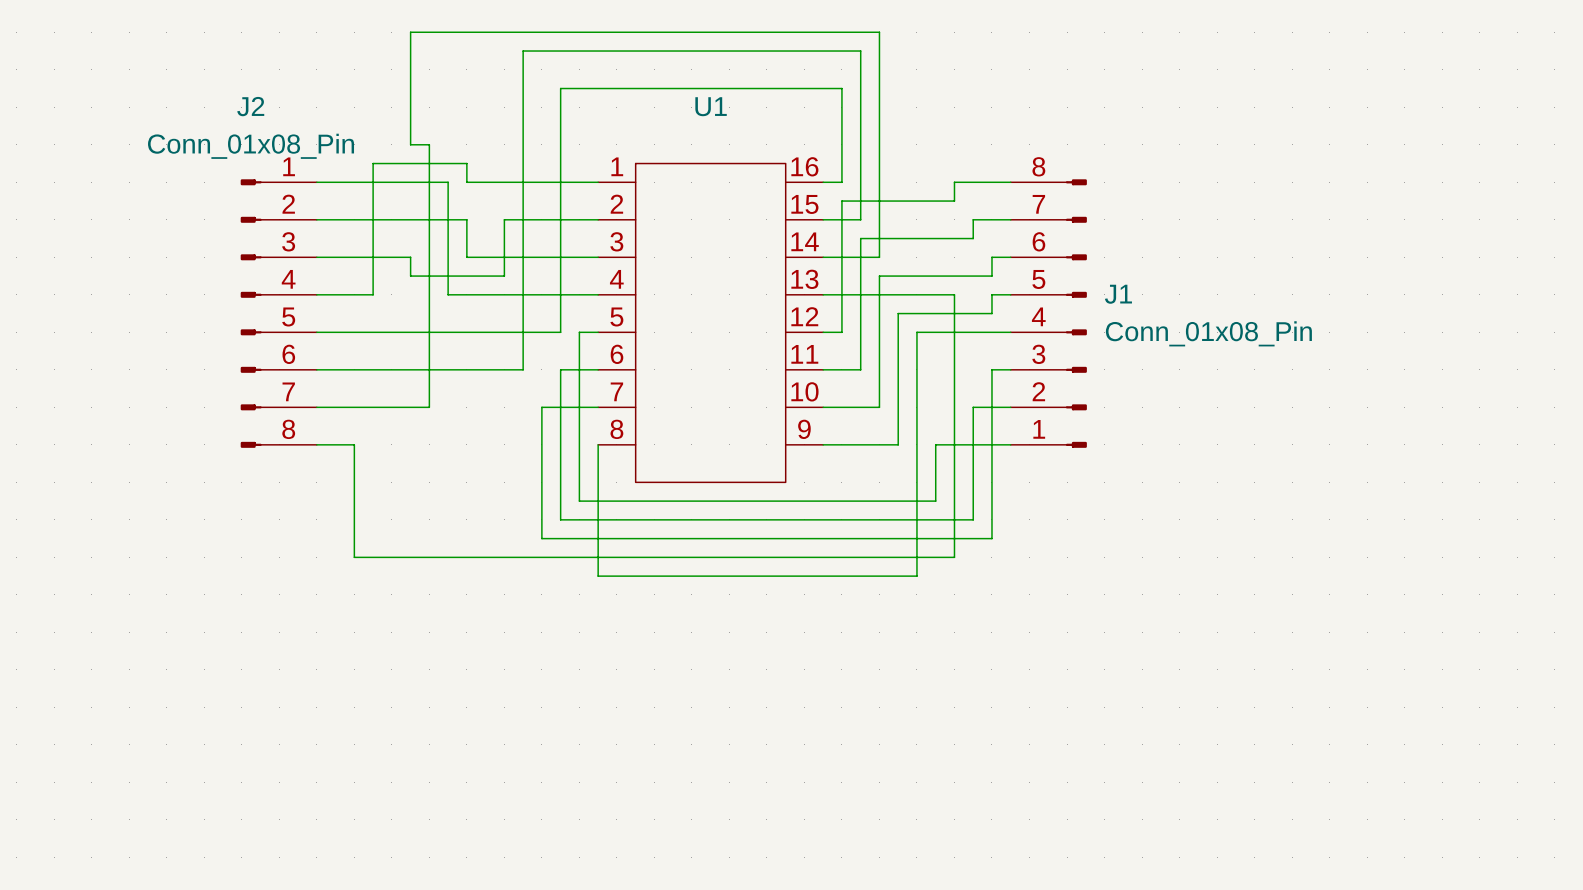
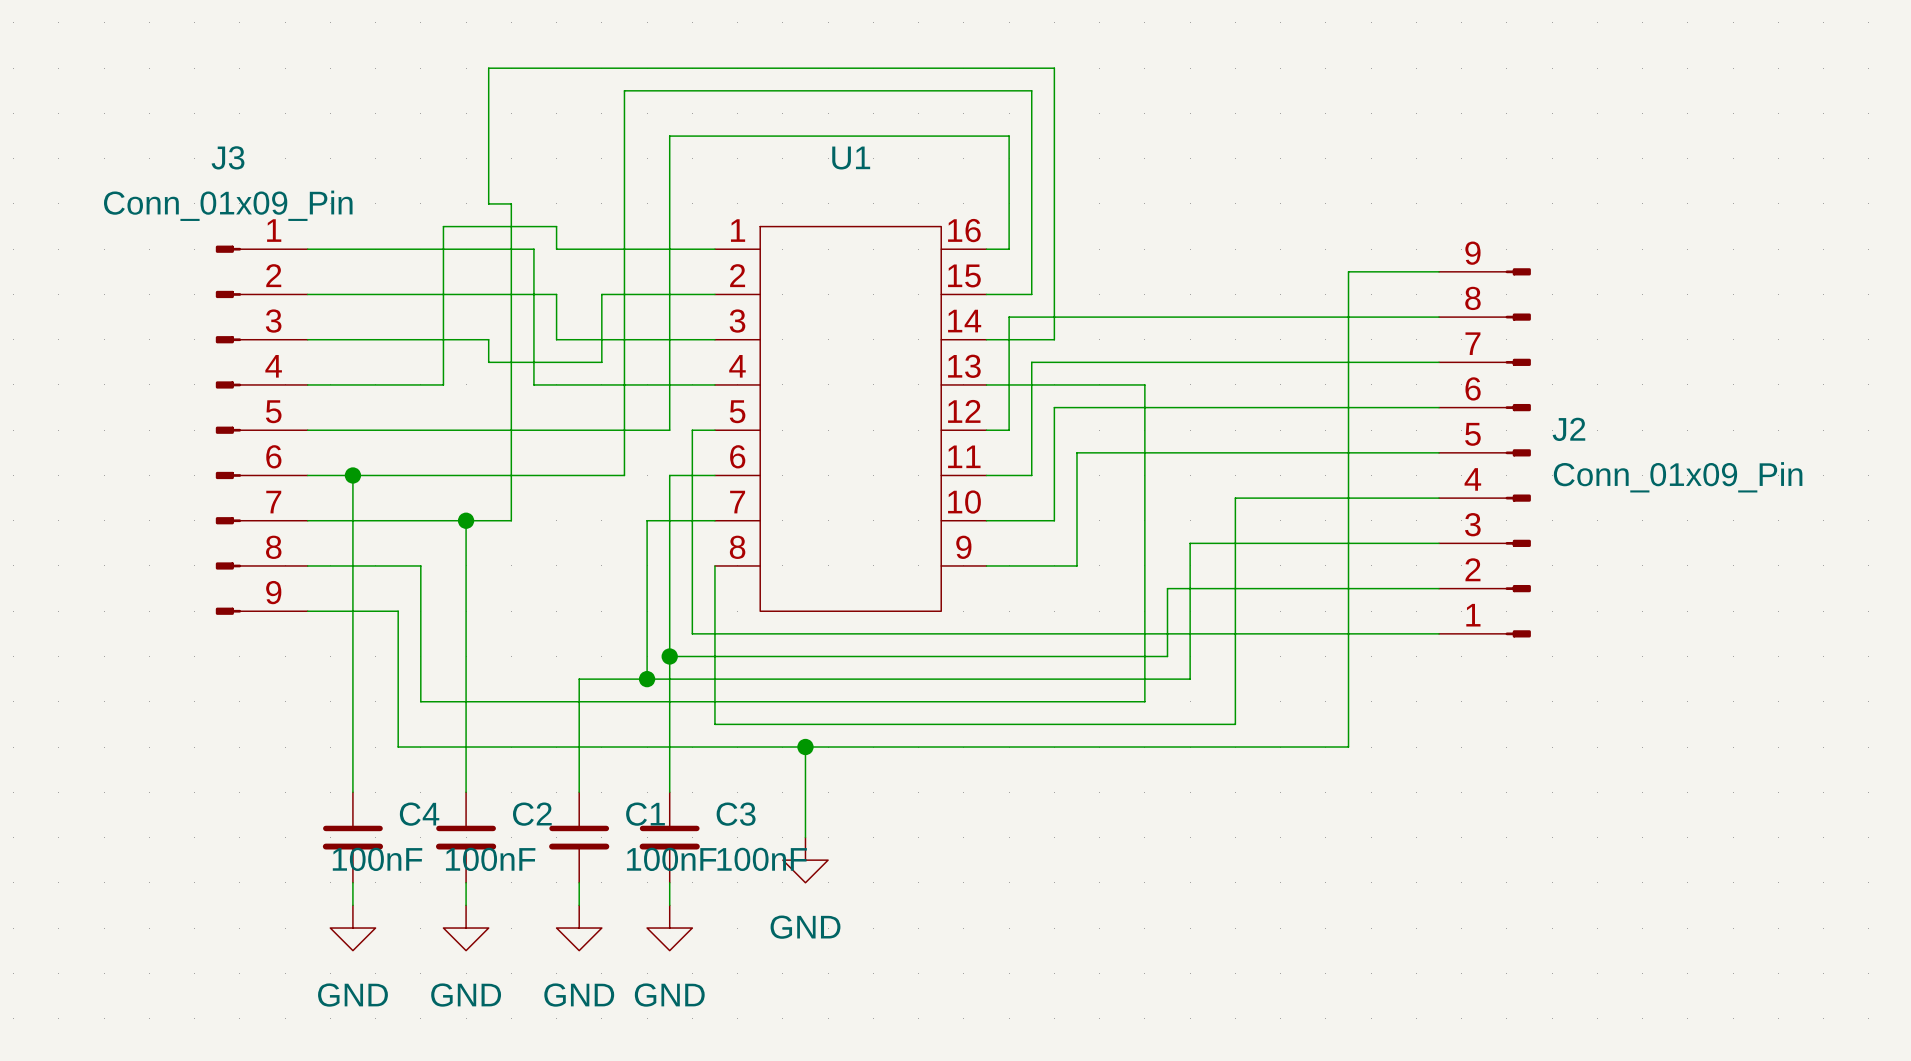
J2 name position: J2 (250, 106) -> J2 (1568, 429)
J2 value: Conn_01x08_Pin (251, 146) -> Conn_01x09_Pin (1678, 477)
J2 symbol: [240, 179, 317, 448] -> [1439, 268, 1531, 638]
wire: (1010, 182) (954, 182) (954, 201) (841, 201) (841, 238) -> none
wire: none -> (1439, 271) (1348, 271) (1348, 747) (398, 747) (398, 611) (307, 611)
wire: (1010, 219) (973, 219) (973, 238) -> (1439, 317) (1167, 317)
wire: (860, 238) (860, 276) -> (1031, 317) (1009, 317)
wire: (1010, 257) (991, 257) (991, 276) -> (1439, 362) (1190, 362)
wire: (879, 276) (879, 313) -> (1054, 362) (1031, 362)
wire: (1010, 294) (991, 294) (991, 313) -> (1439, 407) (1190, 407)
wire: (898, 313) (898, 351) -> (1076, 407) (1054, 407)
J1: Conn_01x08_Pin (1048, 313) -> none
J3: none -> Conn_01x09_Pin (261, 430)
wire: (1010, 332) (916, 332) (916, 576) -> (1439, 498) (1235, 498) (1235, 724) (1099, 724)
wire: none -> (1076, 452) (1439, 452)
wire: none -> (352, 475) (352, 792)
junction: none -> (352, 475)
wire: (1010, 369) (991, 369) (991, 426) -> (1439, 543) (1190, 543)
wire: none -> (466, 520) (466, 792)
junction: none -> (466, 520)
wire: (1010, 407) (973, 407) (973, 463) -> (1439, 588) (1167, 588)
wire: (1010, 444) (935, 444) (935, 501) -> (1439, 633) (1122, 633)
wire: none -> (669, 656) (669, 792)
junction: none -> (669, 656)
wire: none -> (647, 679) (579, 679) (579, 792)
junction: none -> (647, 679)
wire: none -> (805, 747) (805, 837)
junction: none -> (805, 747)
C4: none -> 100nF (352, 837)
C2: none -> 100nF (466, 837)
C1: none -> 100nF (579, 837)
C3: none -> 100nF (669, 837)
power symbol: none -> GND (805, 860)
wire: none -> (352, 882) (352, 905)
wire: none -> (466, 882) (466, 905)
wire: none -> (579, 882) (579, 905)
wire: none -> (669, 882) (669, 905)
power symbol: none -> GND (352, 928)
power symbol: none -> GND (466, 928)
power symbol: none -> GND (579, 928)
power symbol: none -> GND (669, 928)

